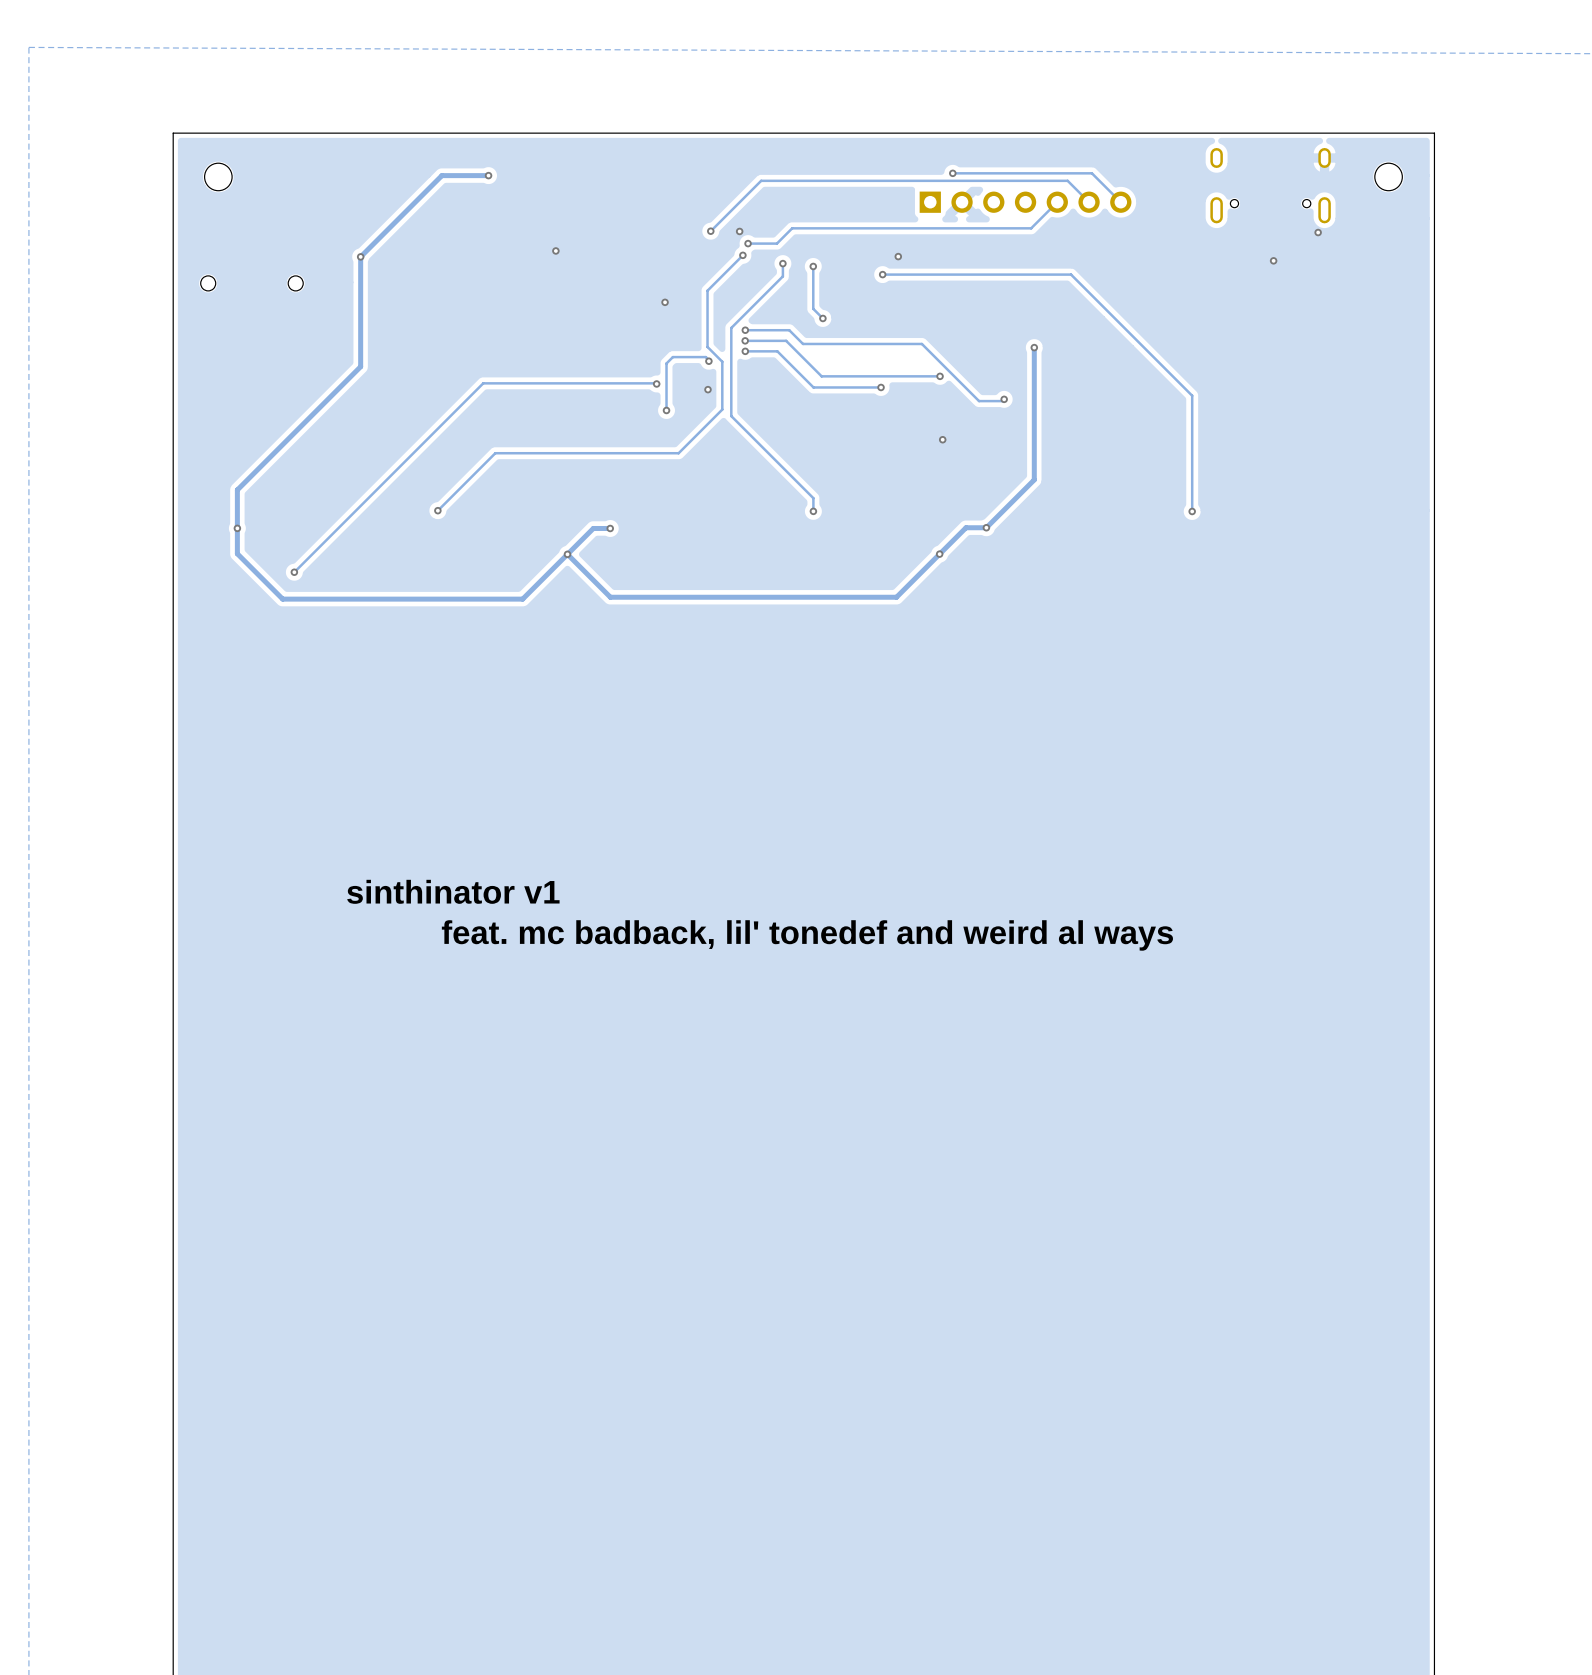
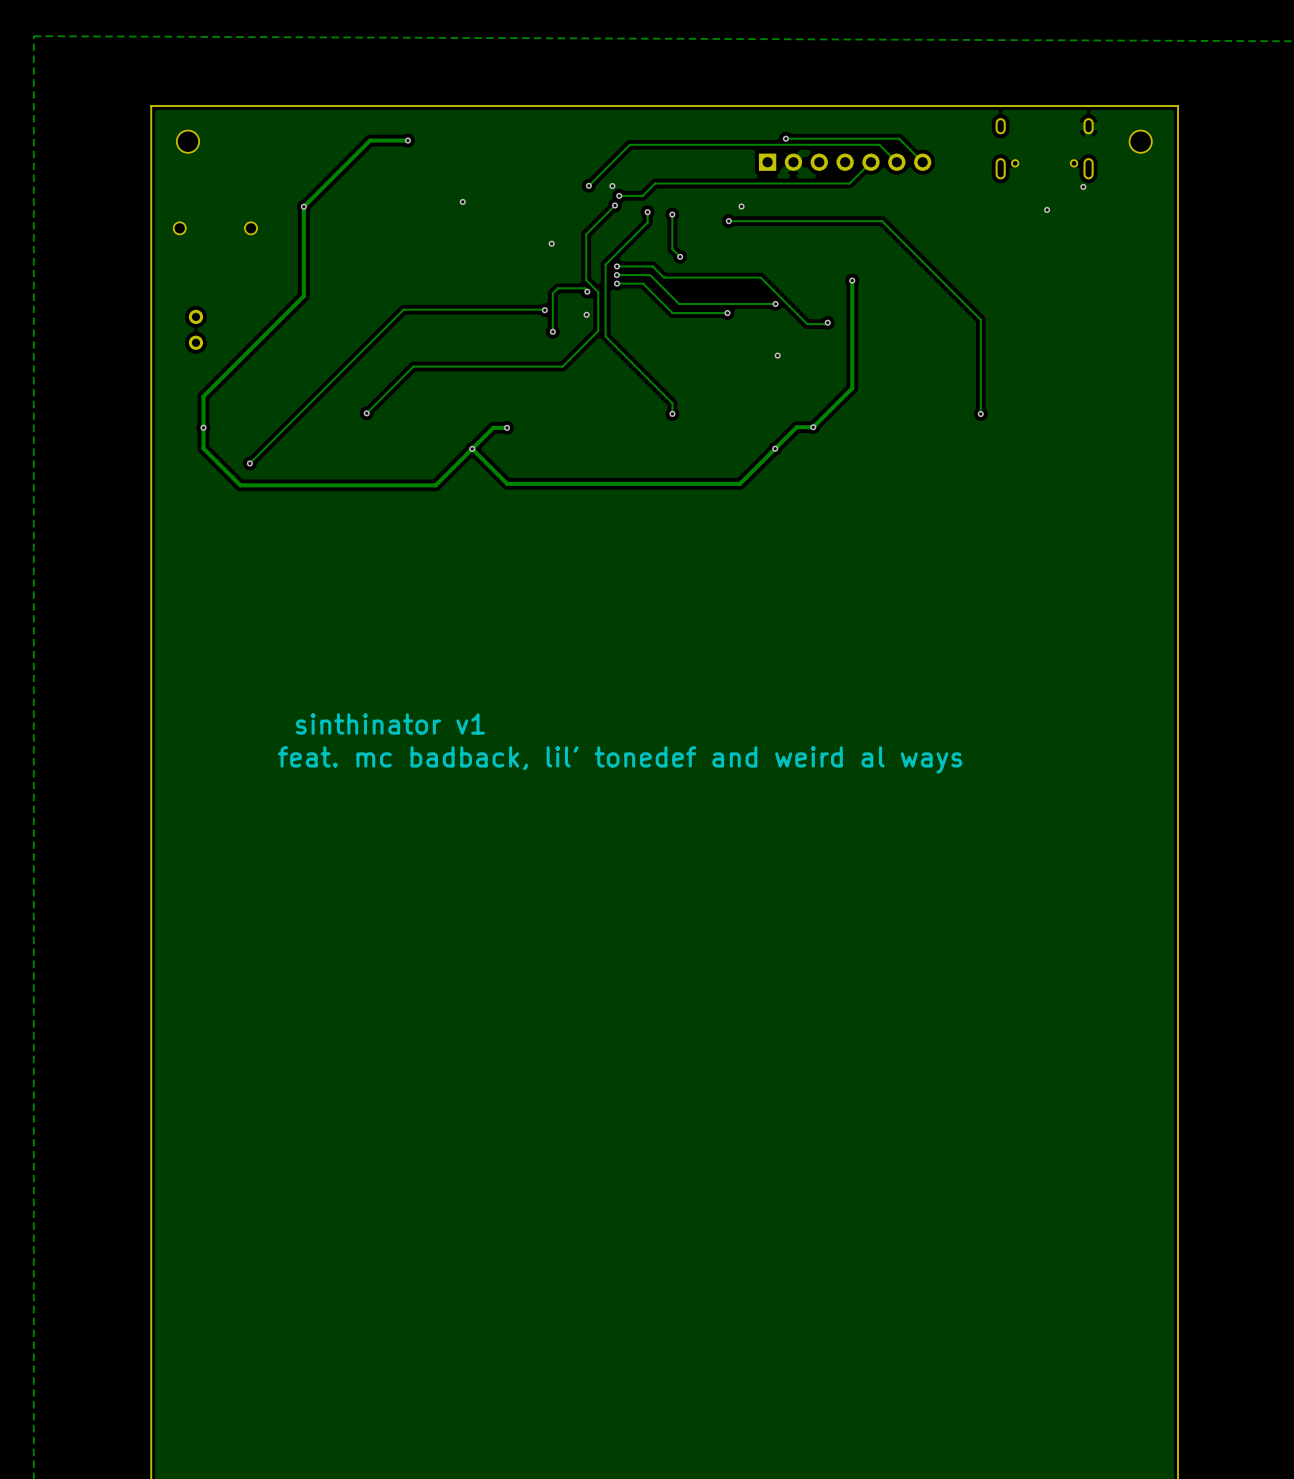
part: none -> (195, 329)

